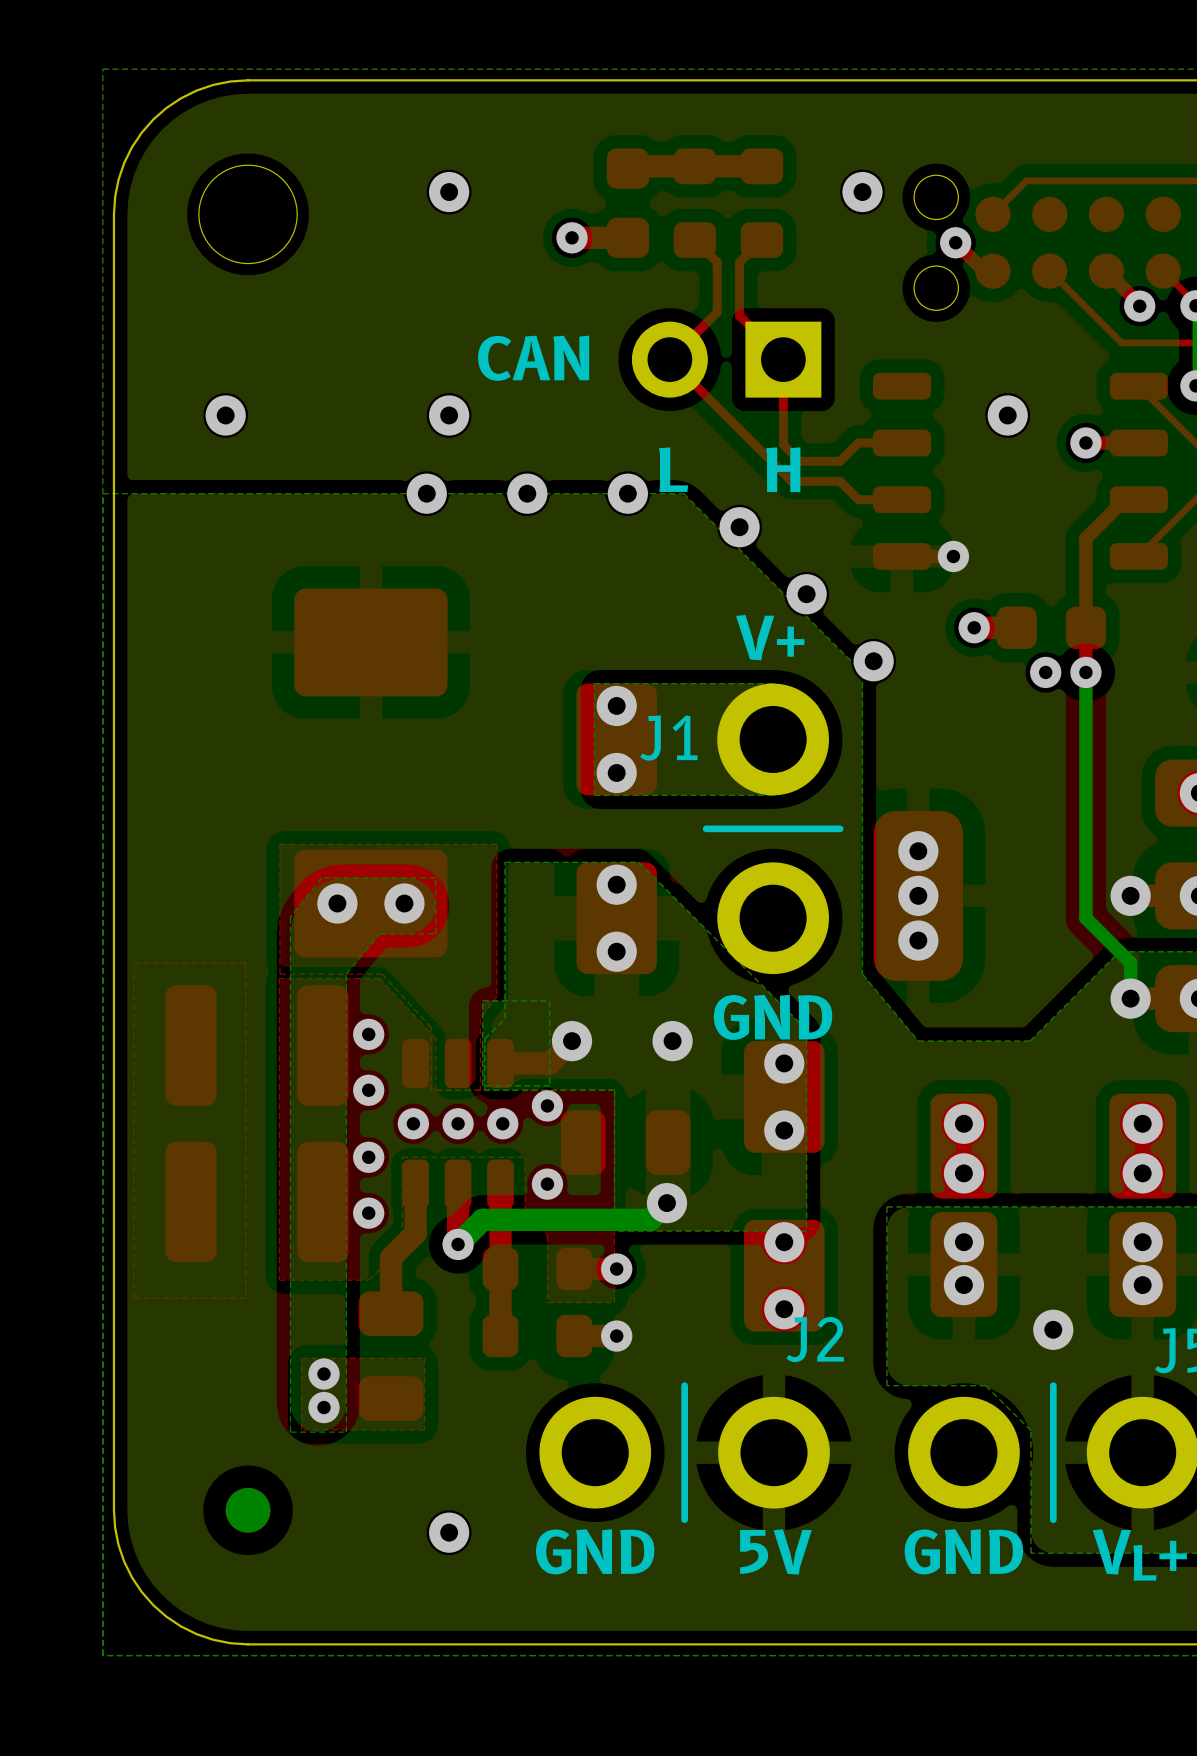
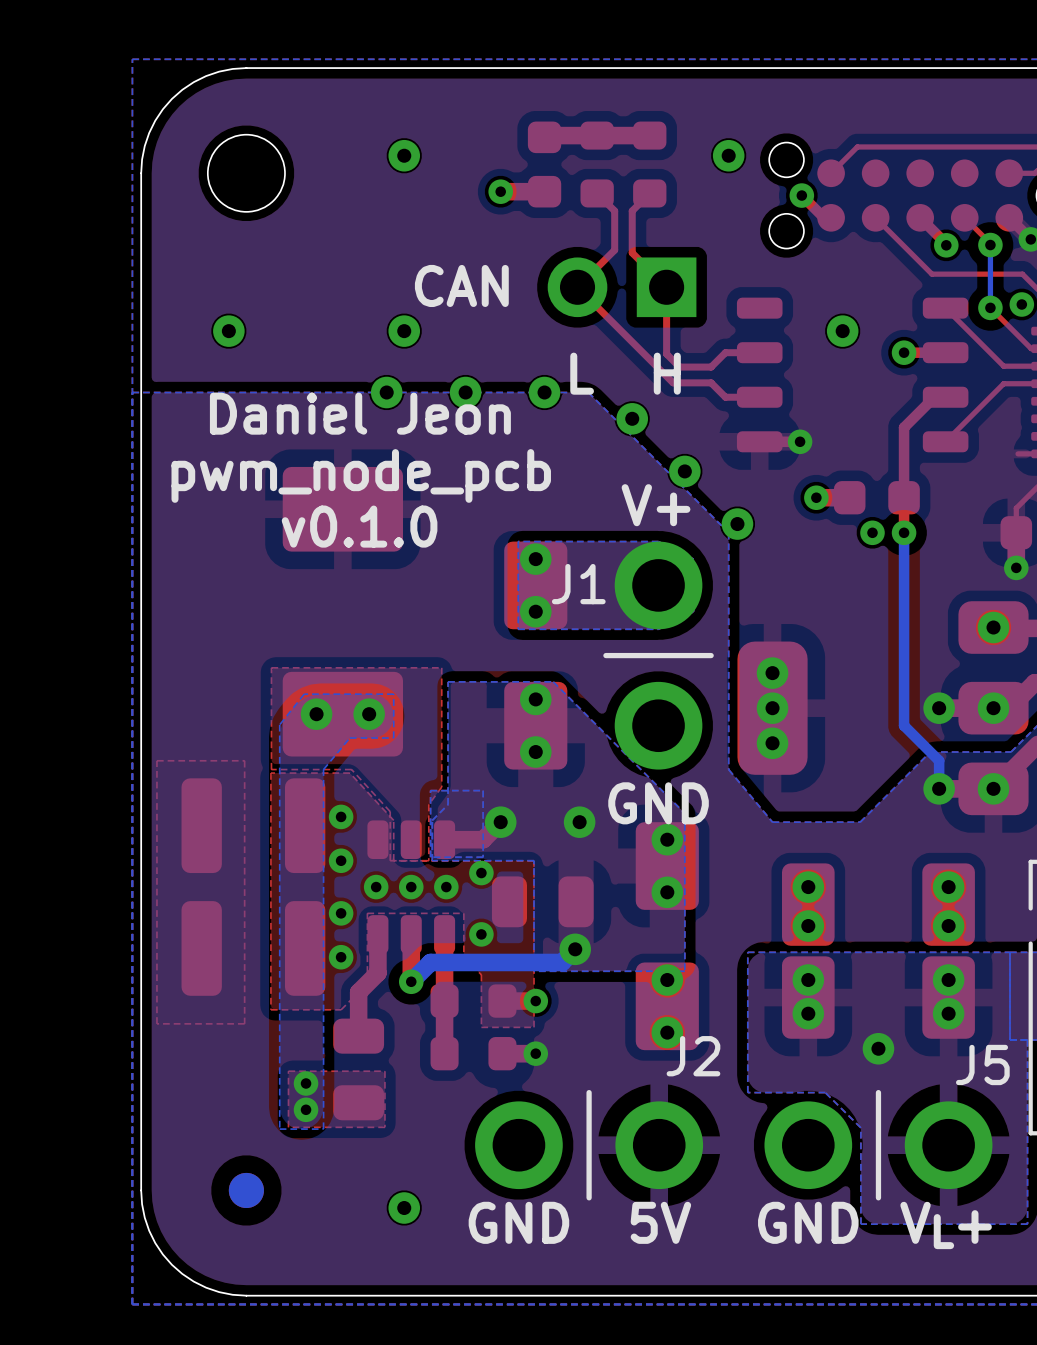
text: none -> Daniel Jeon (360, 413)
text: none -> pwm_node_pcb (361, 475)
text: none -> v0.1.0 (359, 526)

